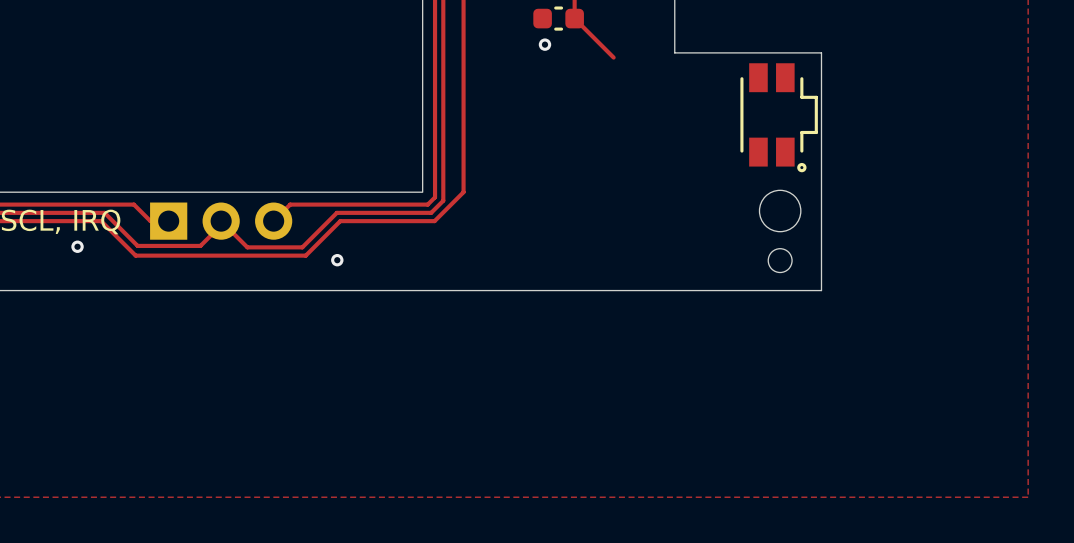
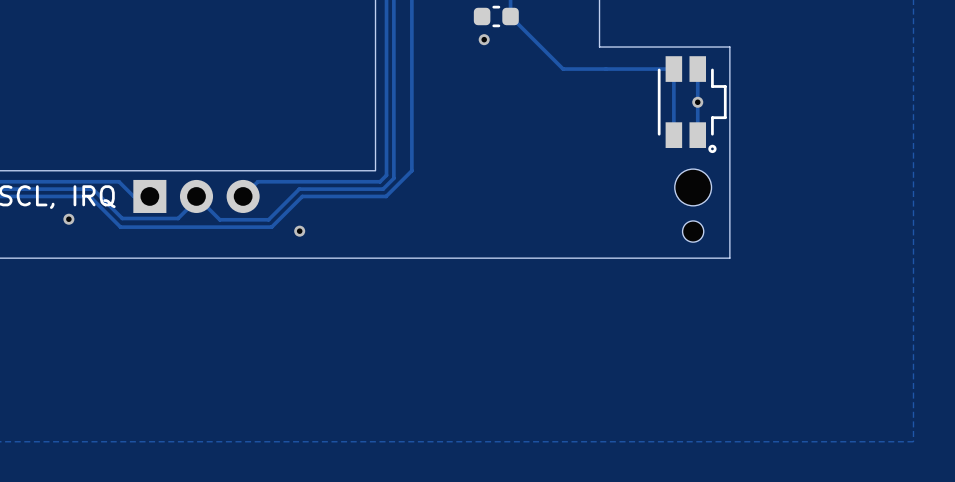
track: none -> (545, 51) (563, 69) (673, 69) (673, 135)
track: none -> (697, 69) (697, 135)
via: none -> (697, 102)

